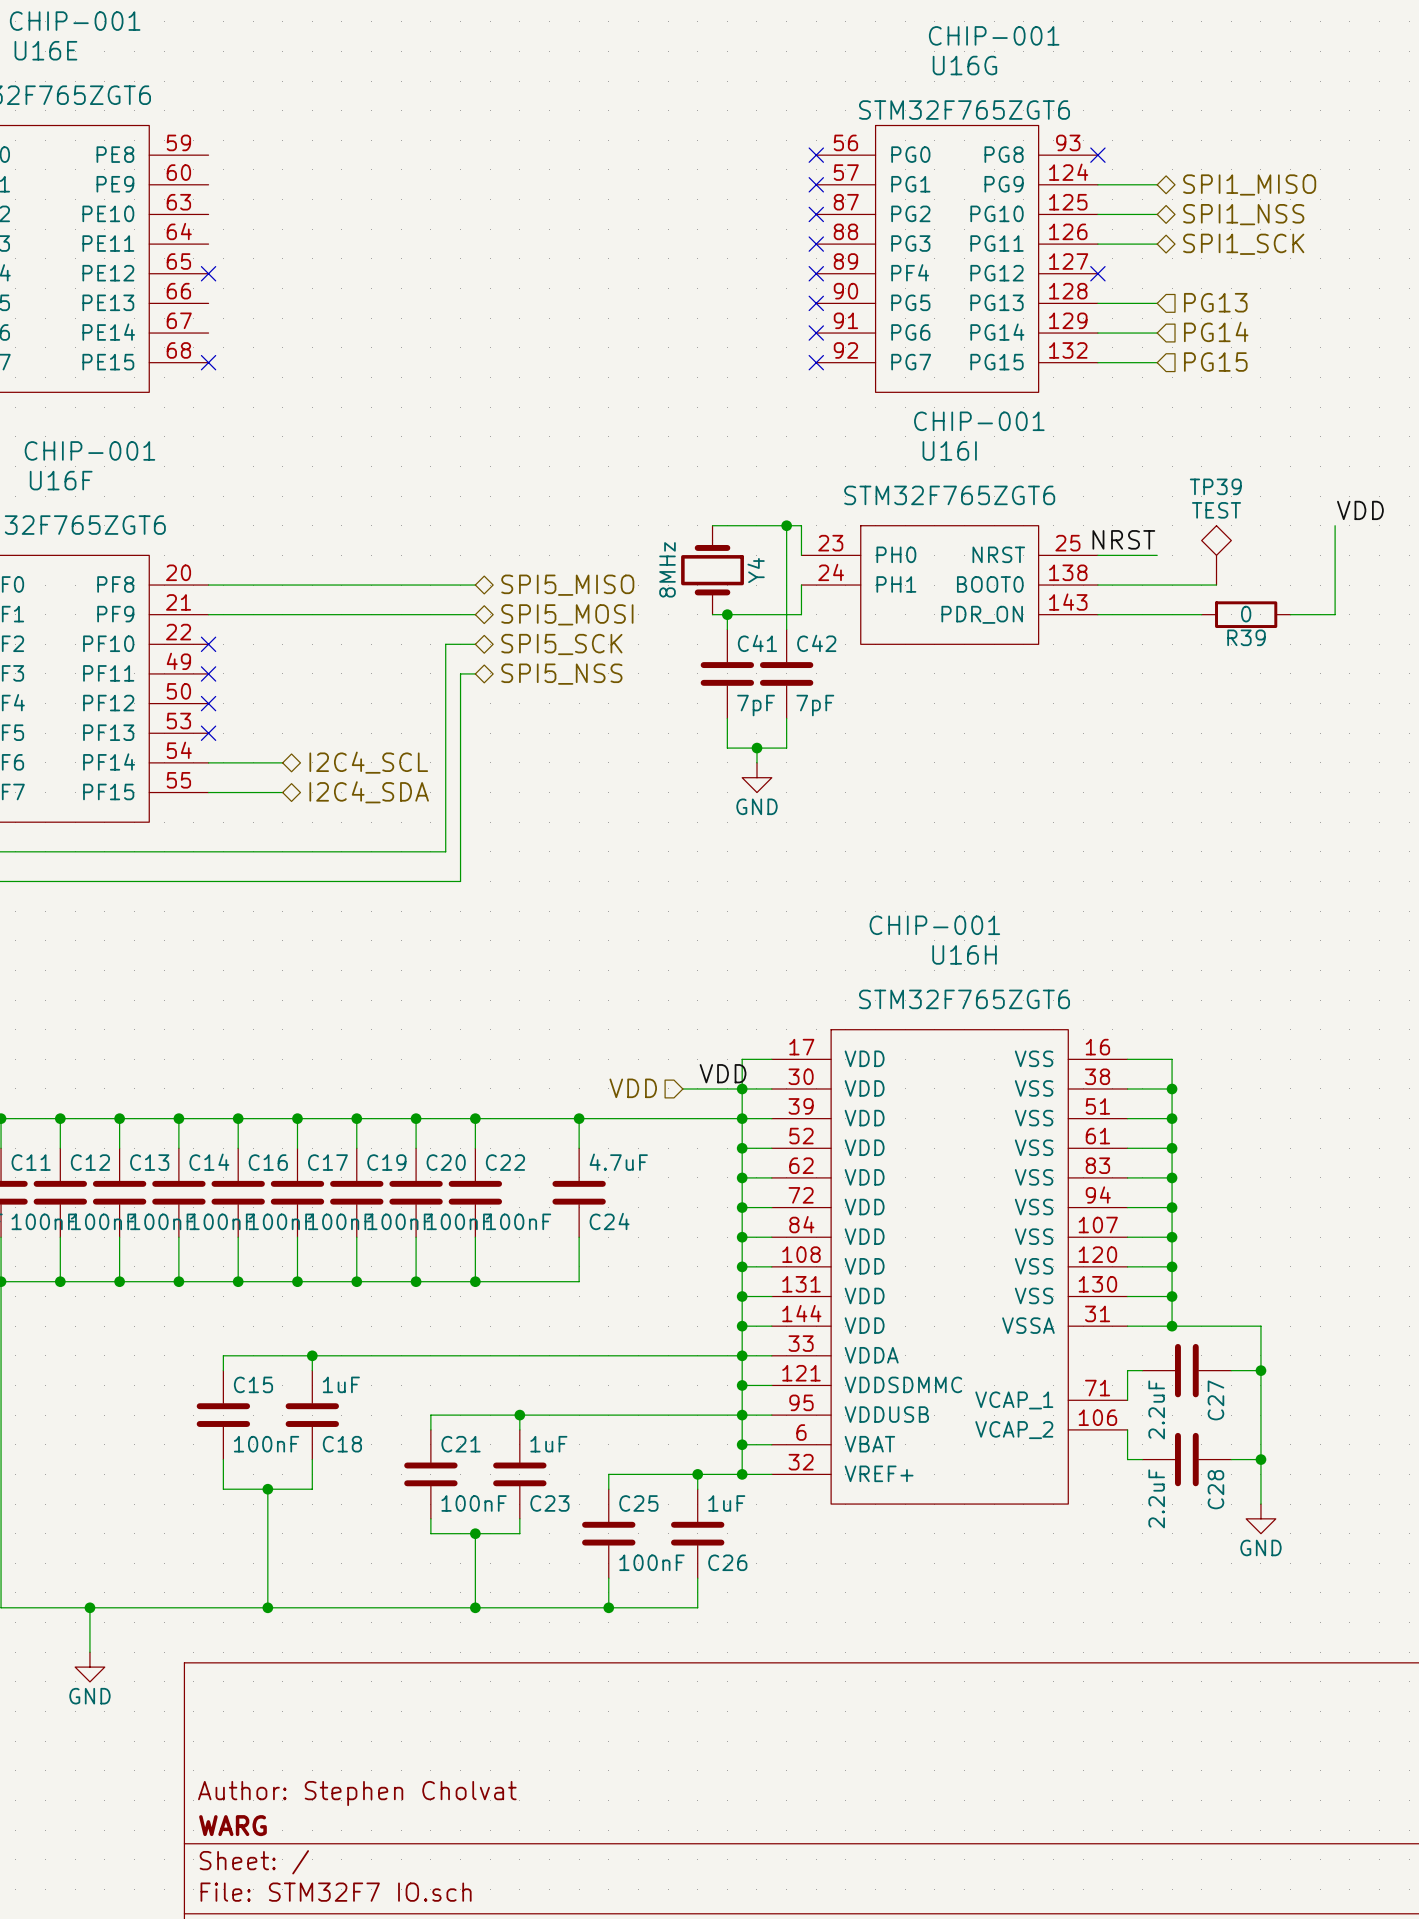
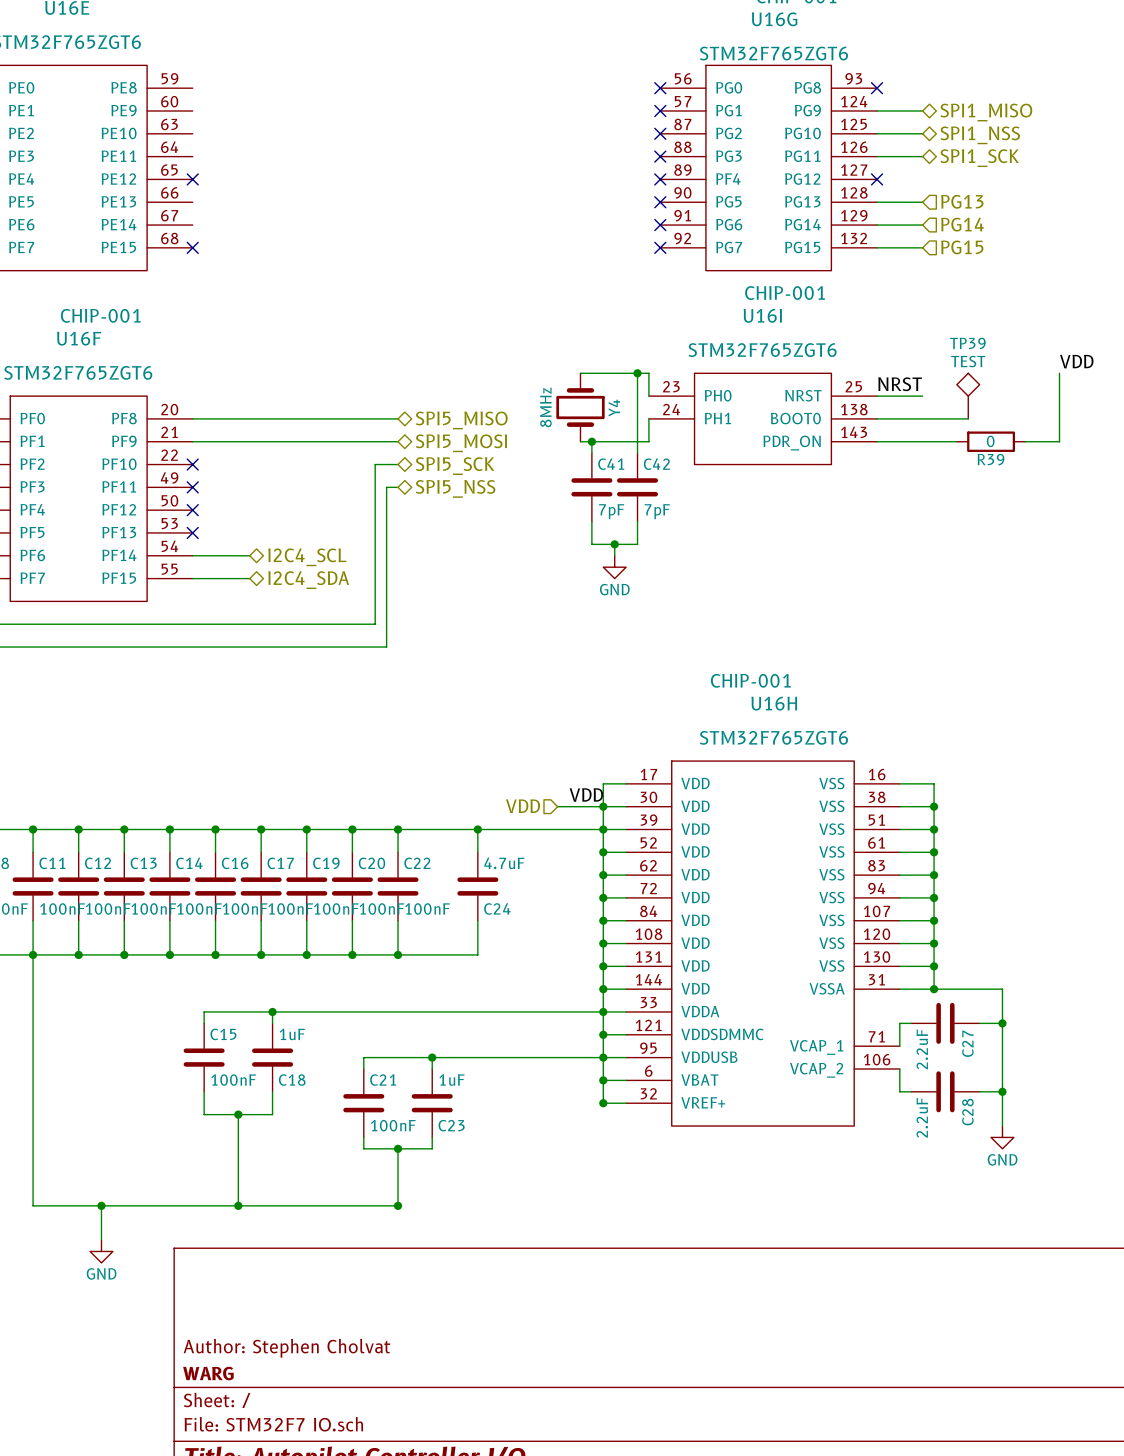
wire: (697, 1474) (697, 1489) -> none
junction: (697, 1474) -> none
wire: (742, 1474) (608, 1474) (608, 1489) -> none
C25: 100nF (608, 1533) -> none
C26: 1uF (697, 1533) -> none
wire: (608, 1578) (608, 1607) -> none
wire: (697, 1578) (697, 1607) (475, 1607) -> none
junction: (608, 1607) -> none

